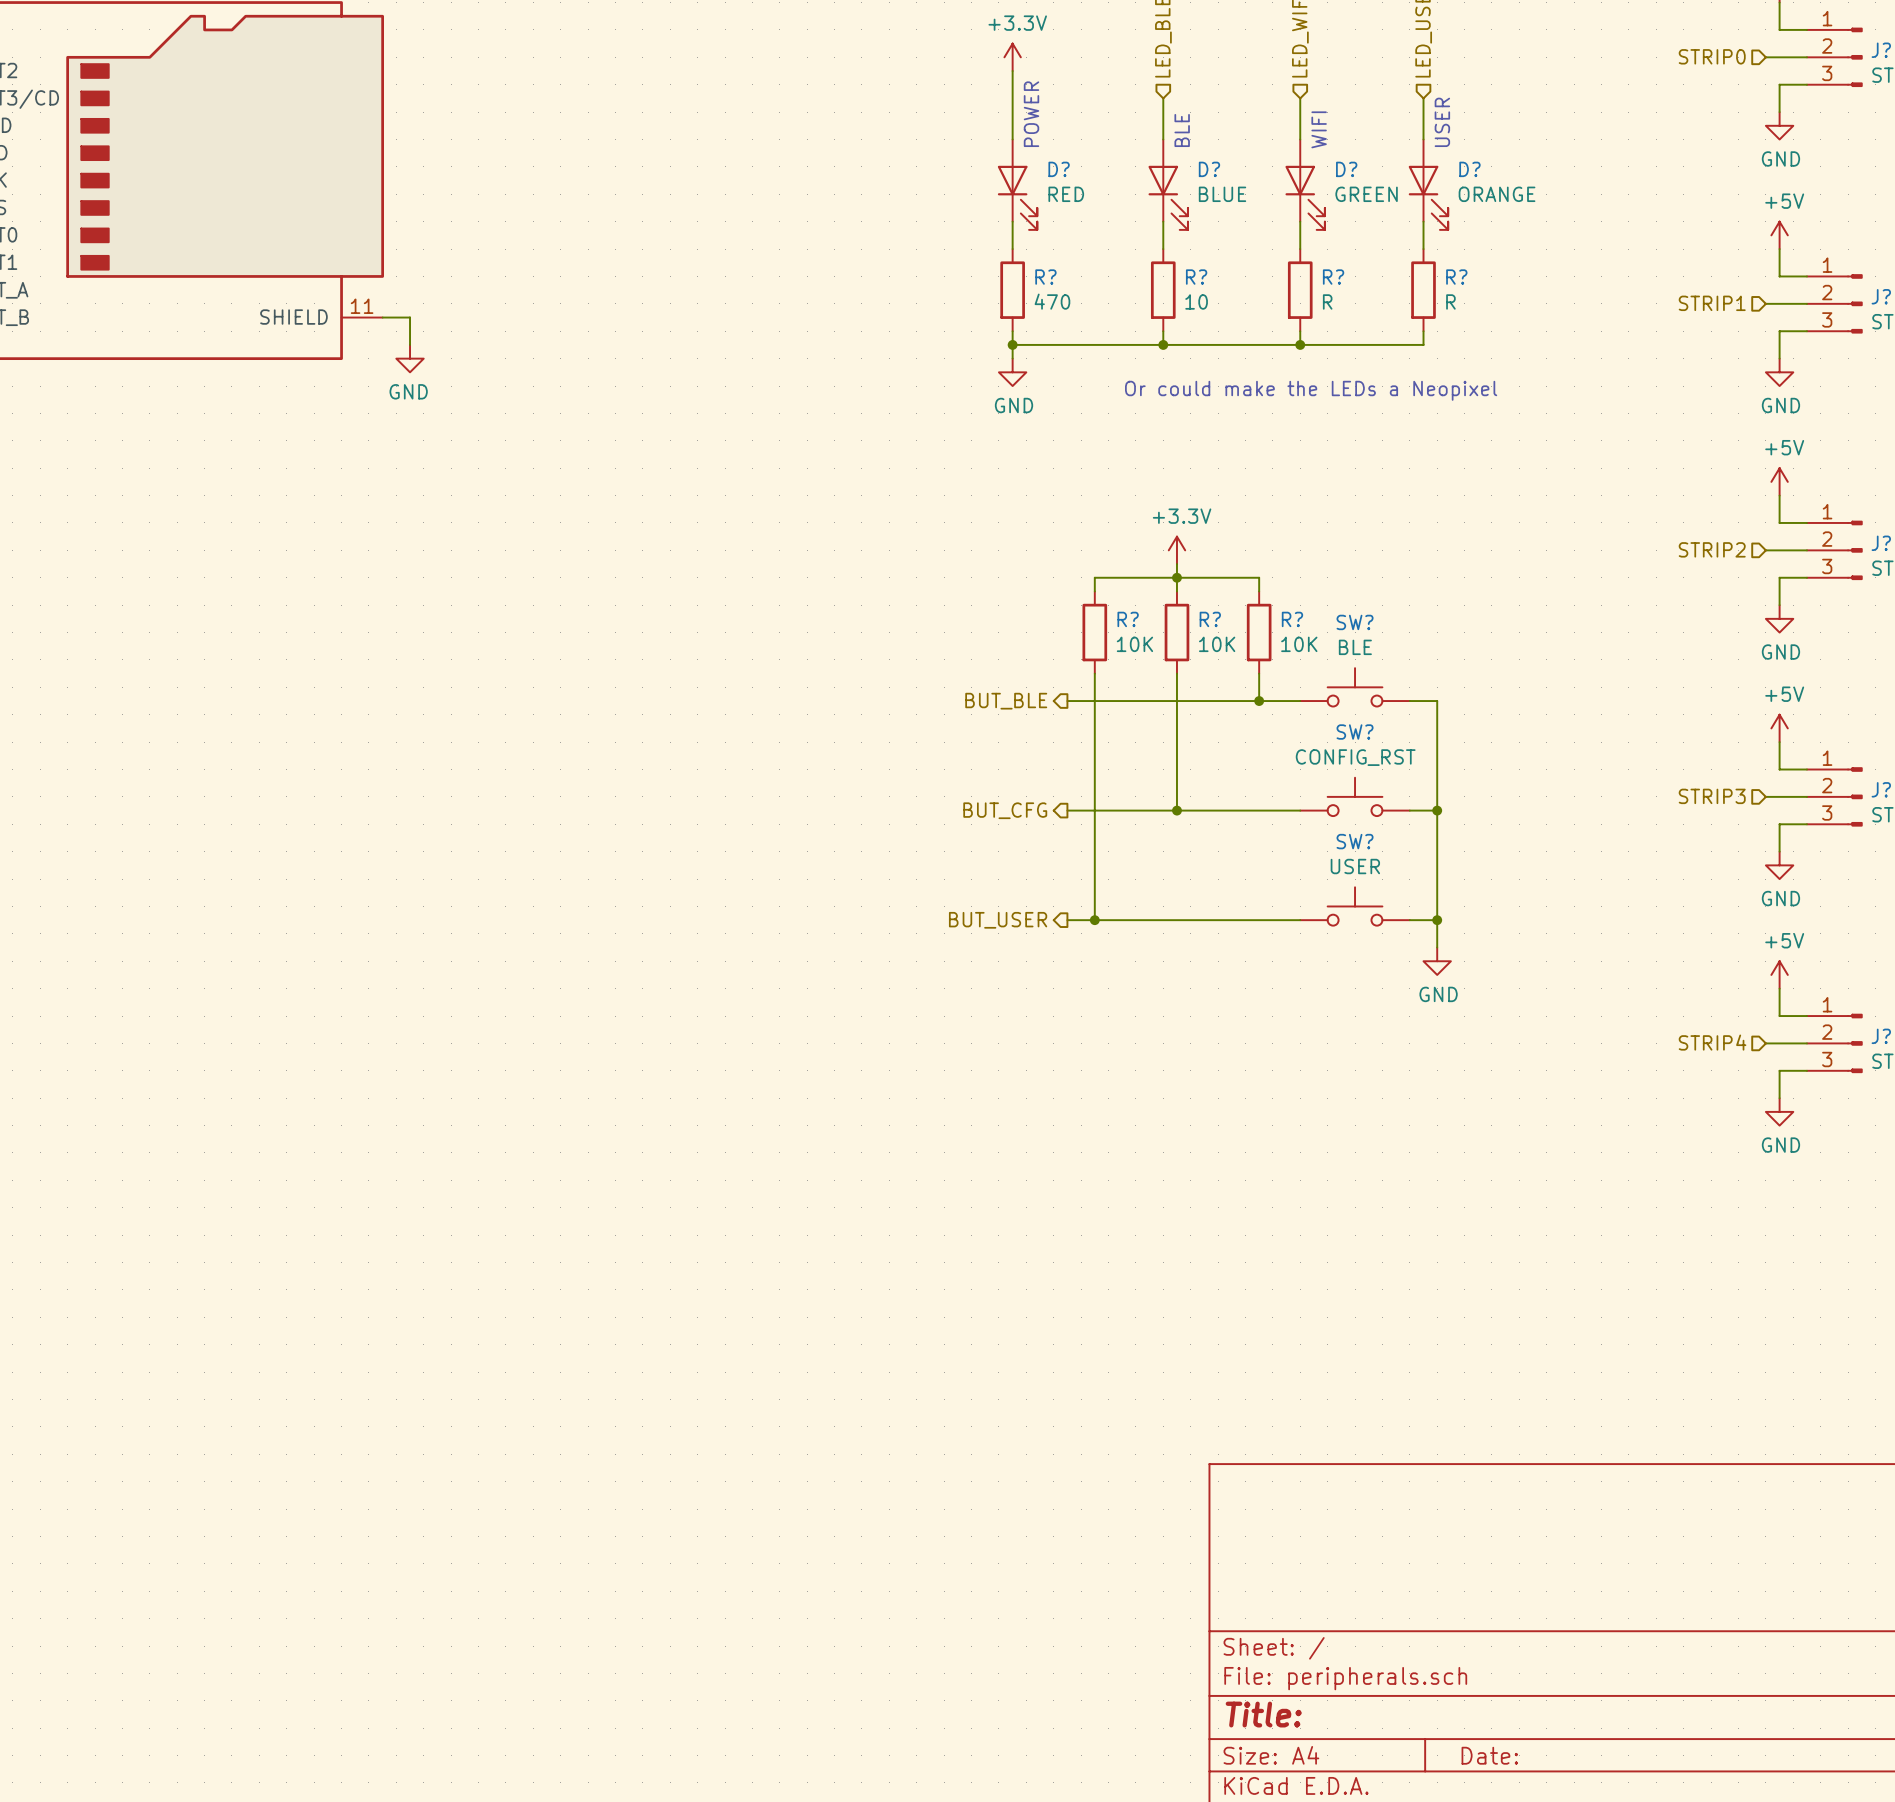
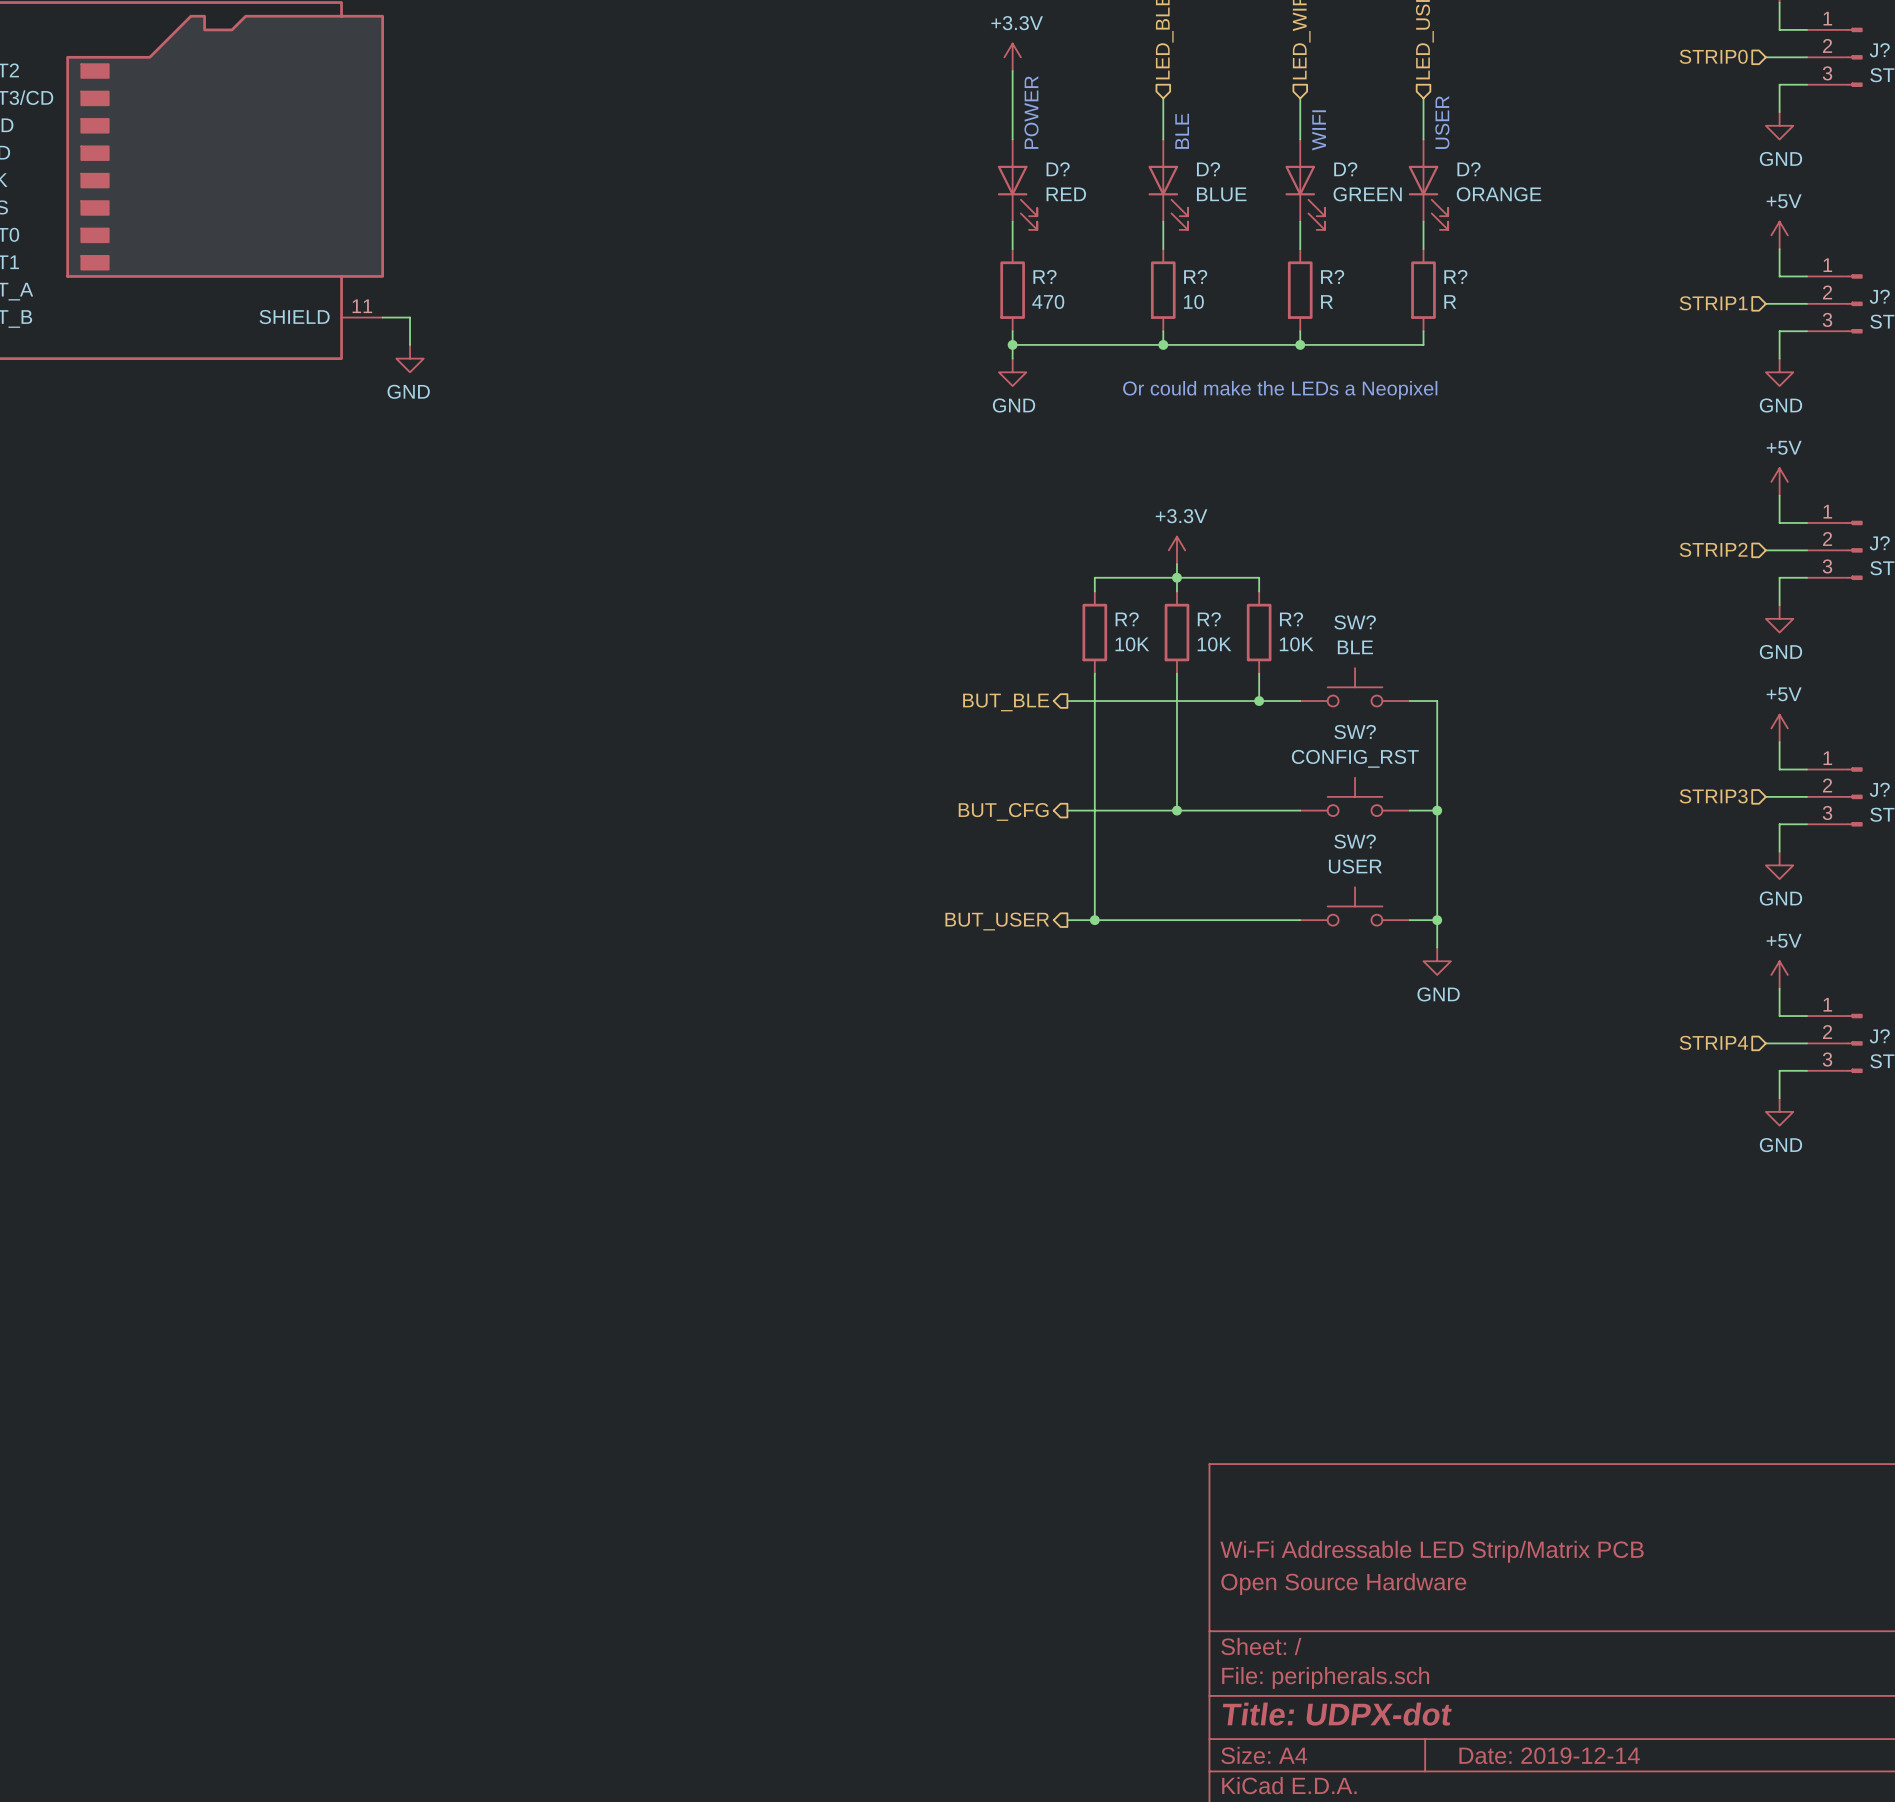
title block: none -> Wi-Fi Addressable LED Strip/Matrix PCB (1432, 1551)
title block: none -> Open Source Hardware (1343, 1584)
title block: Title: (1263, 1714) -> Title: UDPX-dot (1337, 1714)
title block: Date: (1489, 1755) -> Date: 2019-12-14 (1549, 1755)

